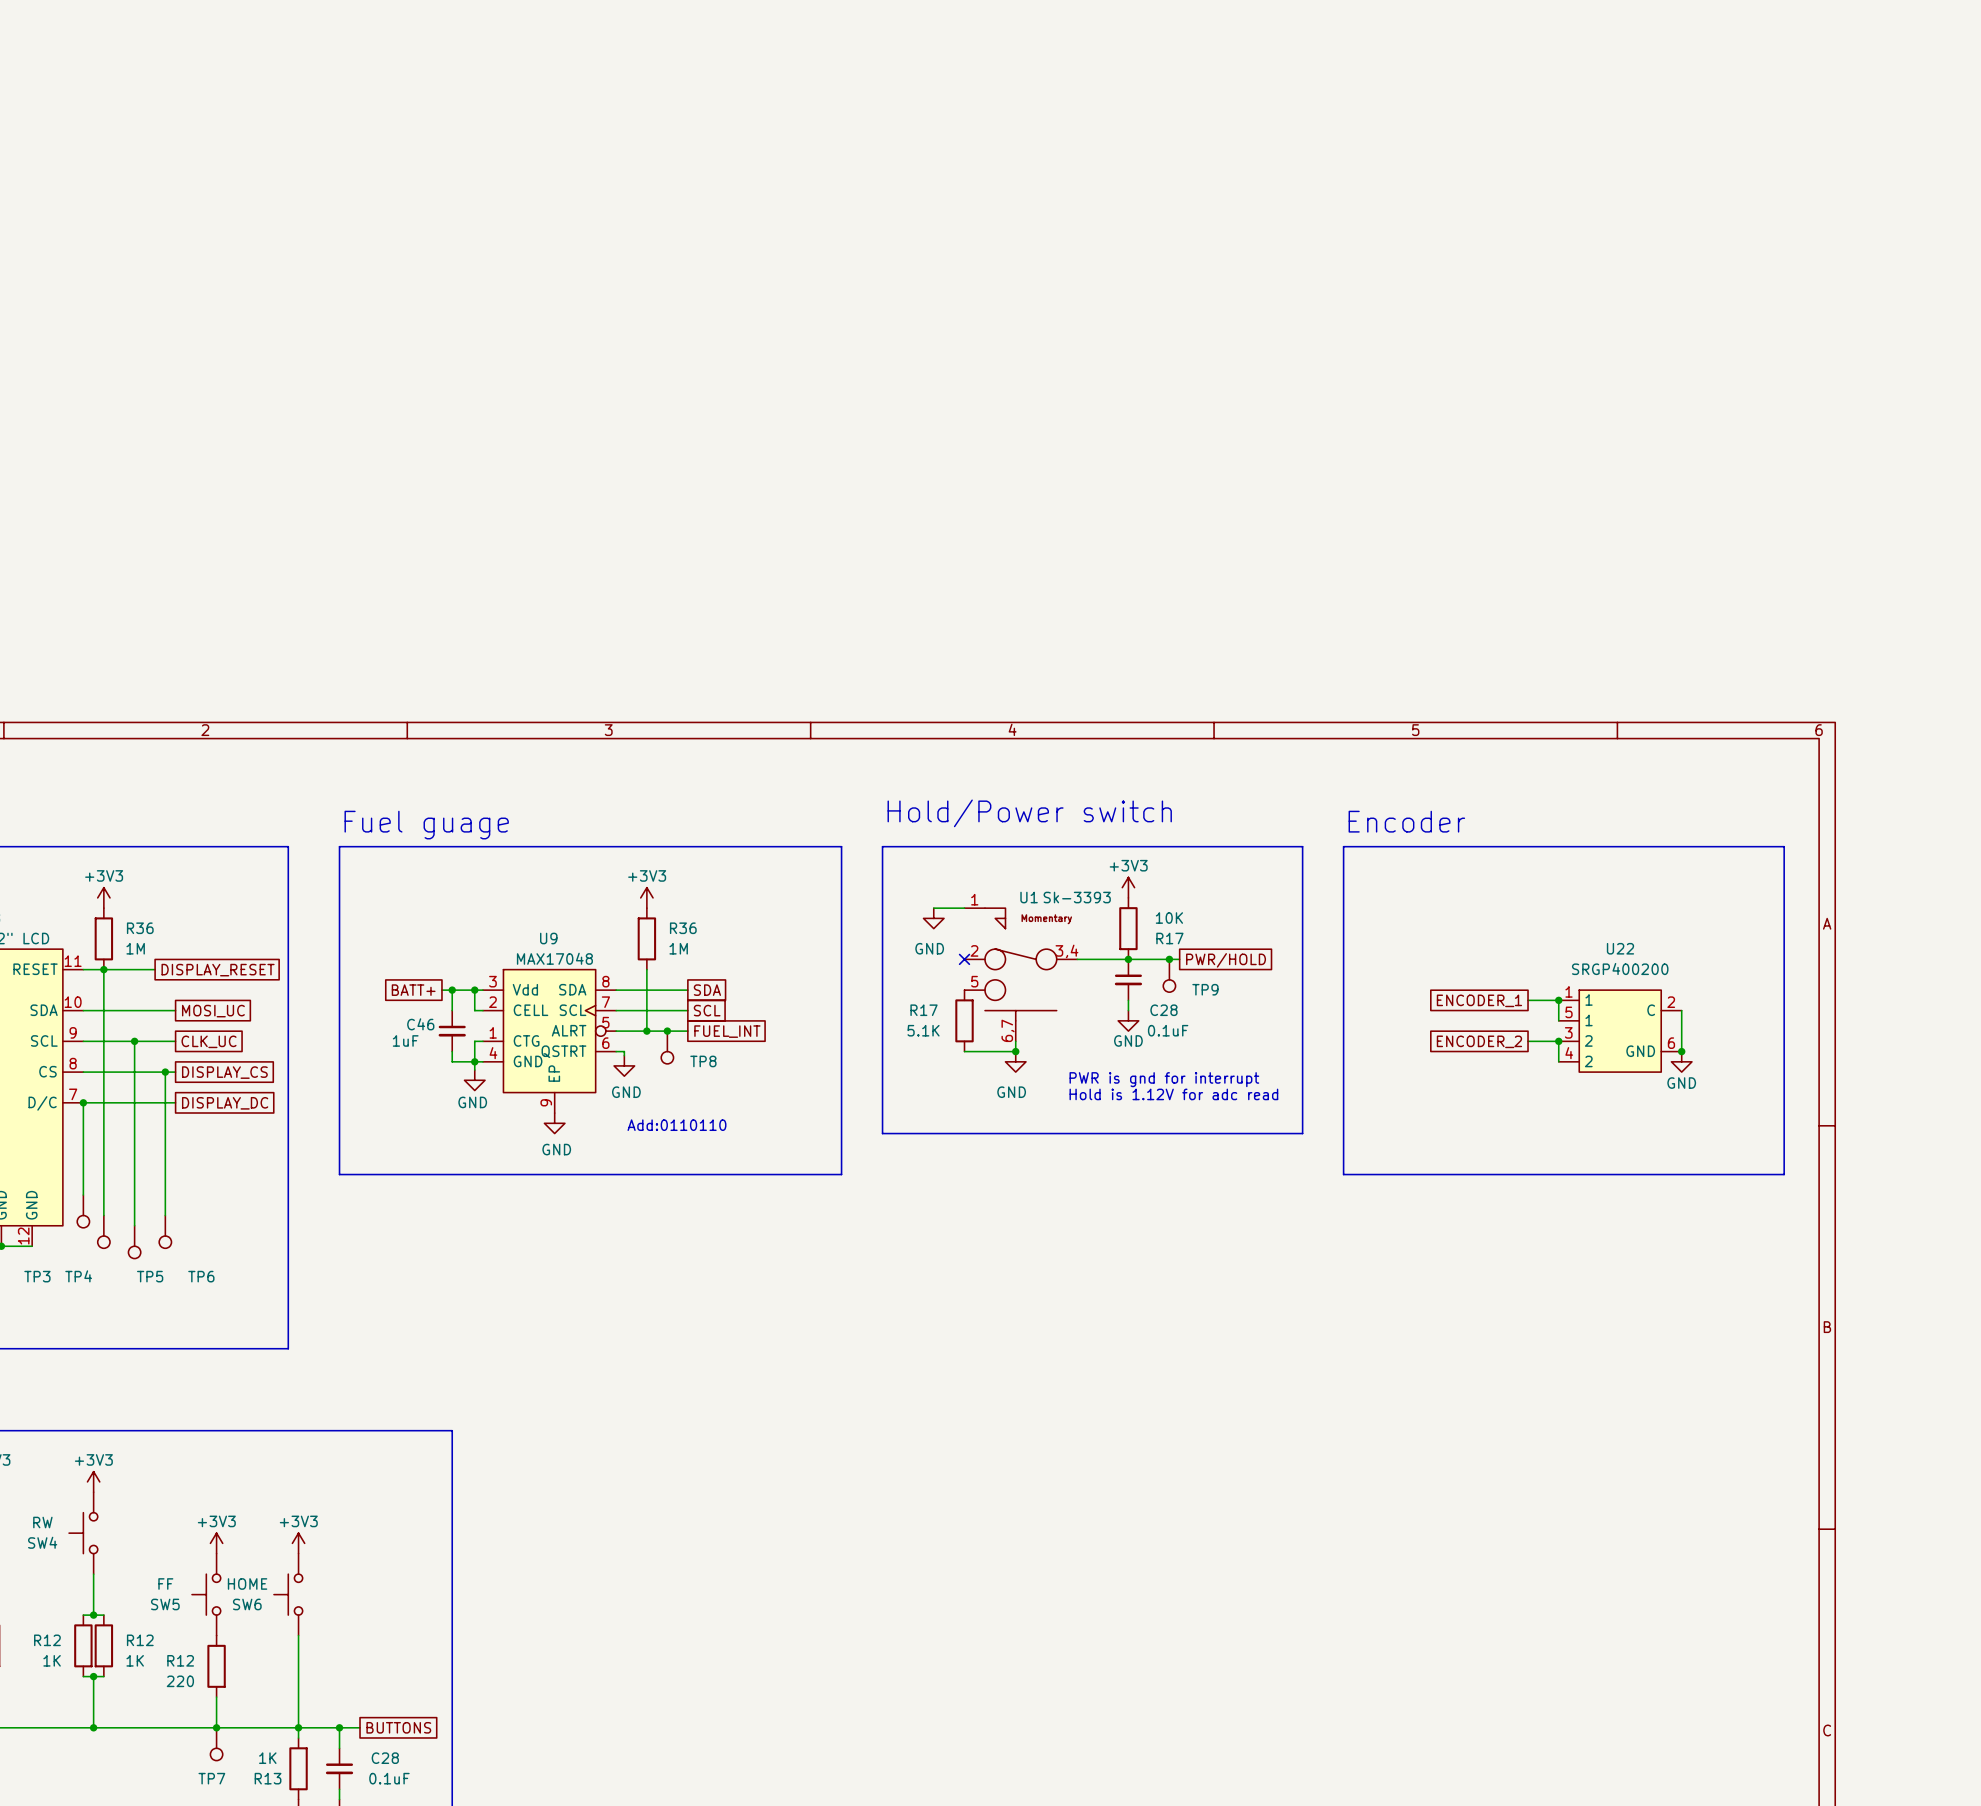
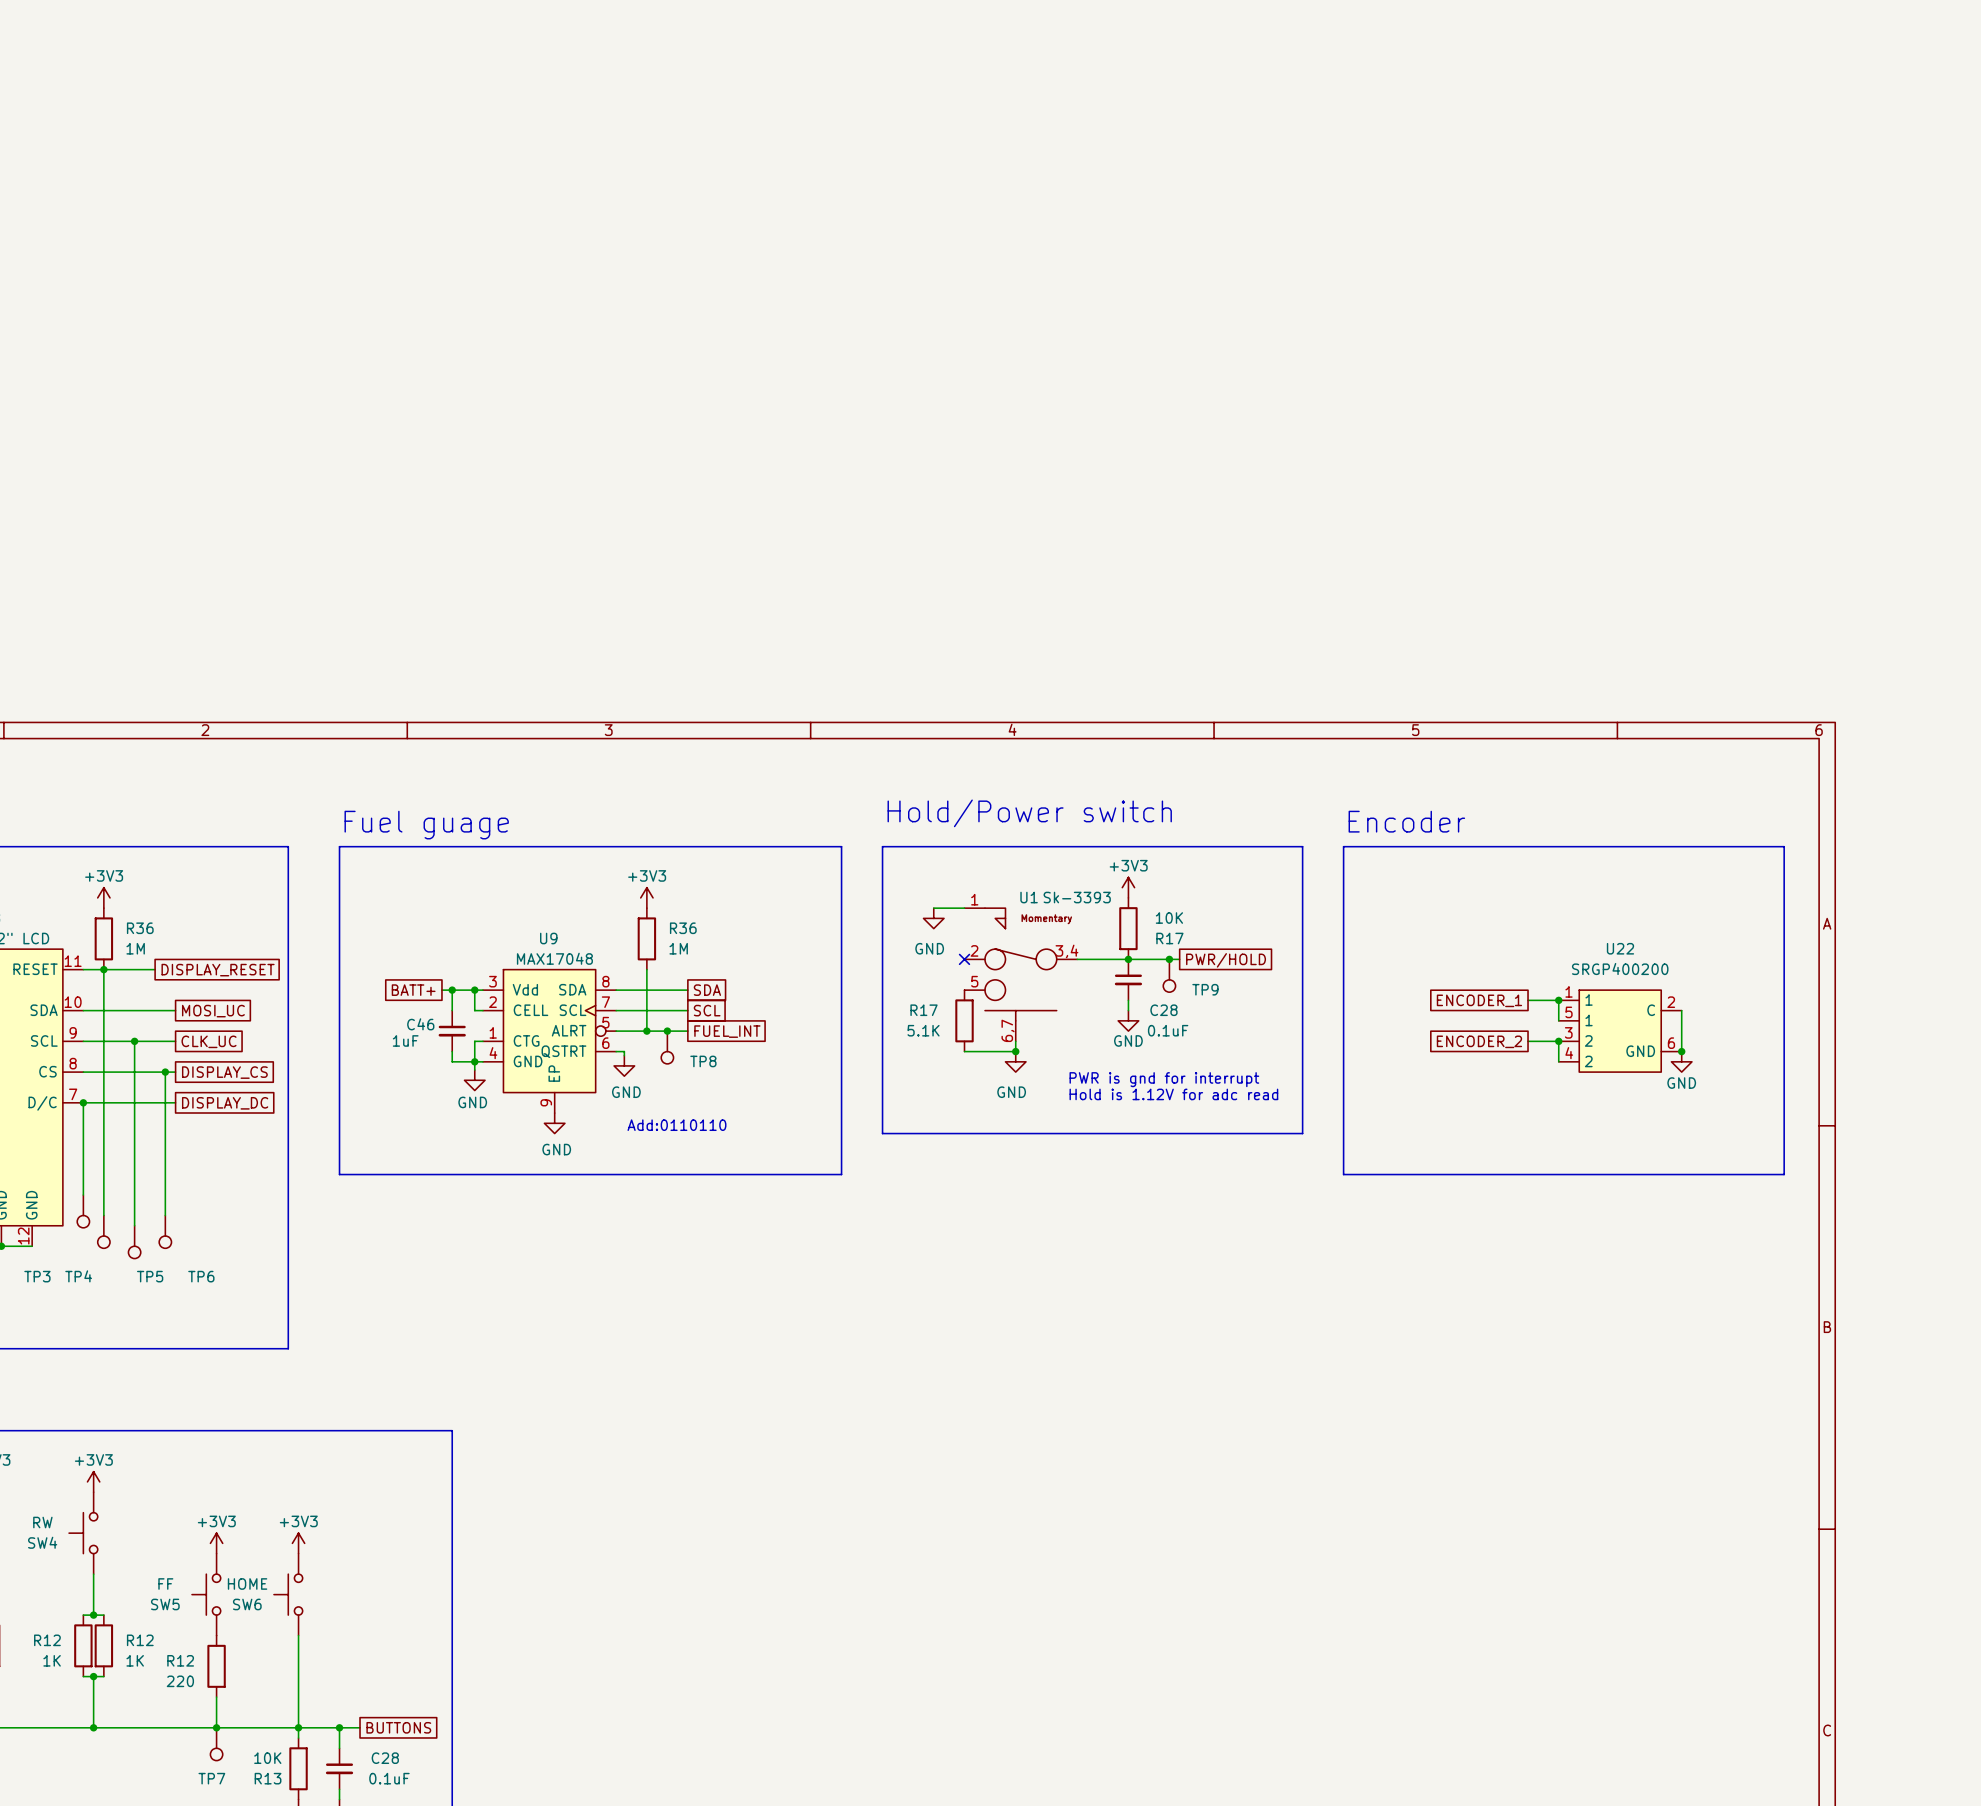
R13 value: 1K (267, 1758) -> 10K (267, 1758)

